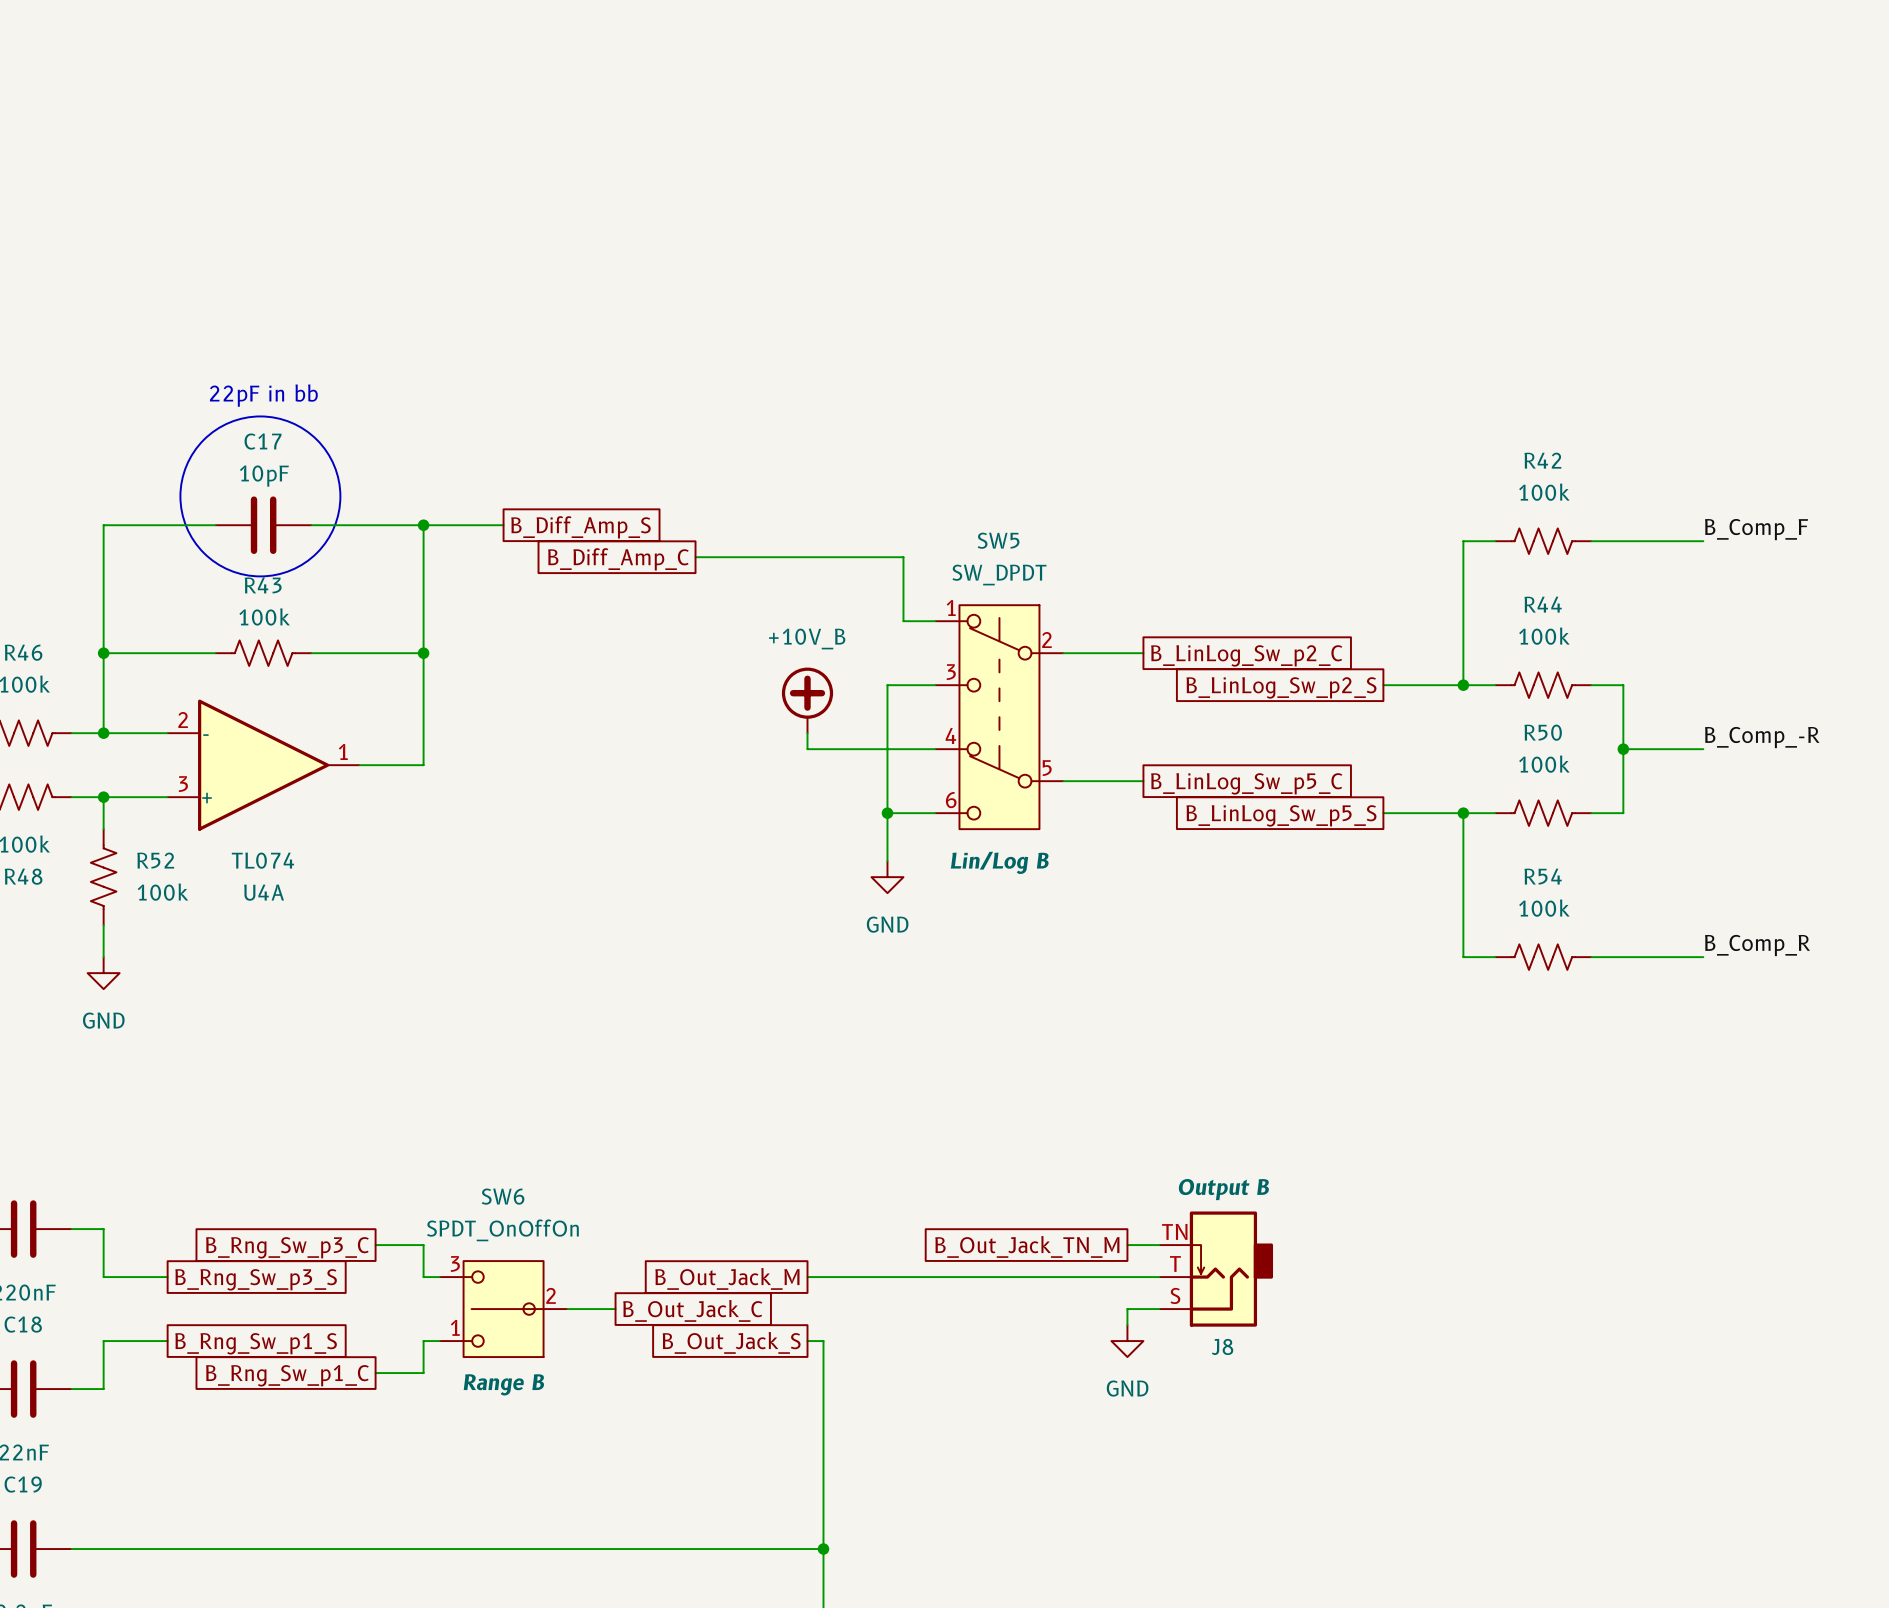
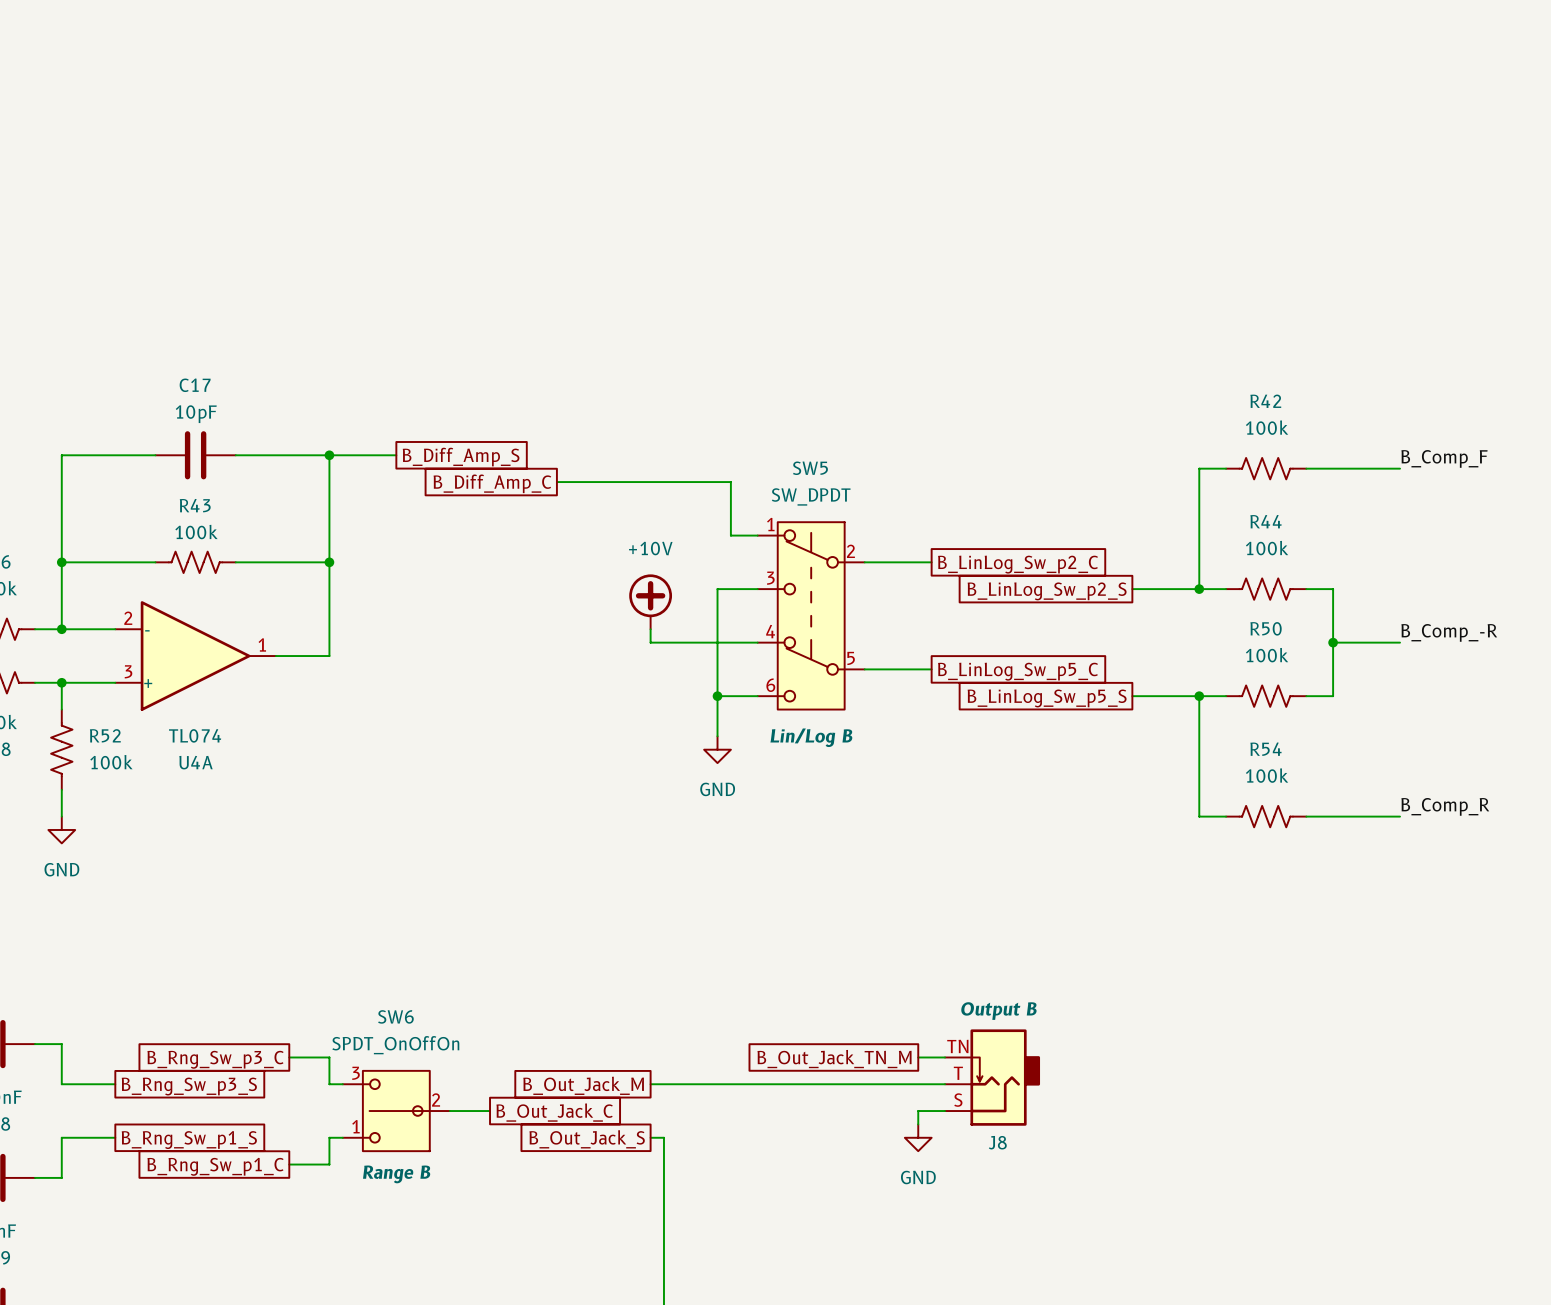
text: 22pF in bb (263, 395) -> none
drawing: [180, 416, 341, 577] -> none
power symbol: +10V_B (807, 700) -> +10V (650, 601)

